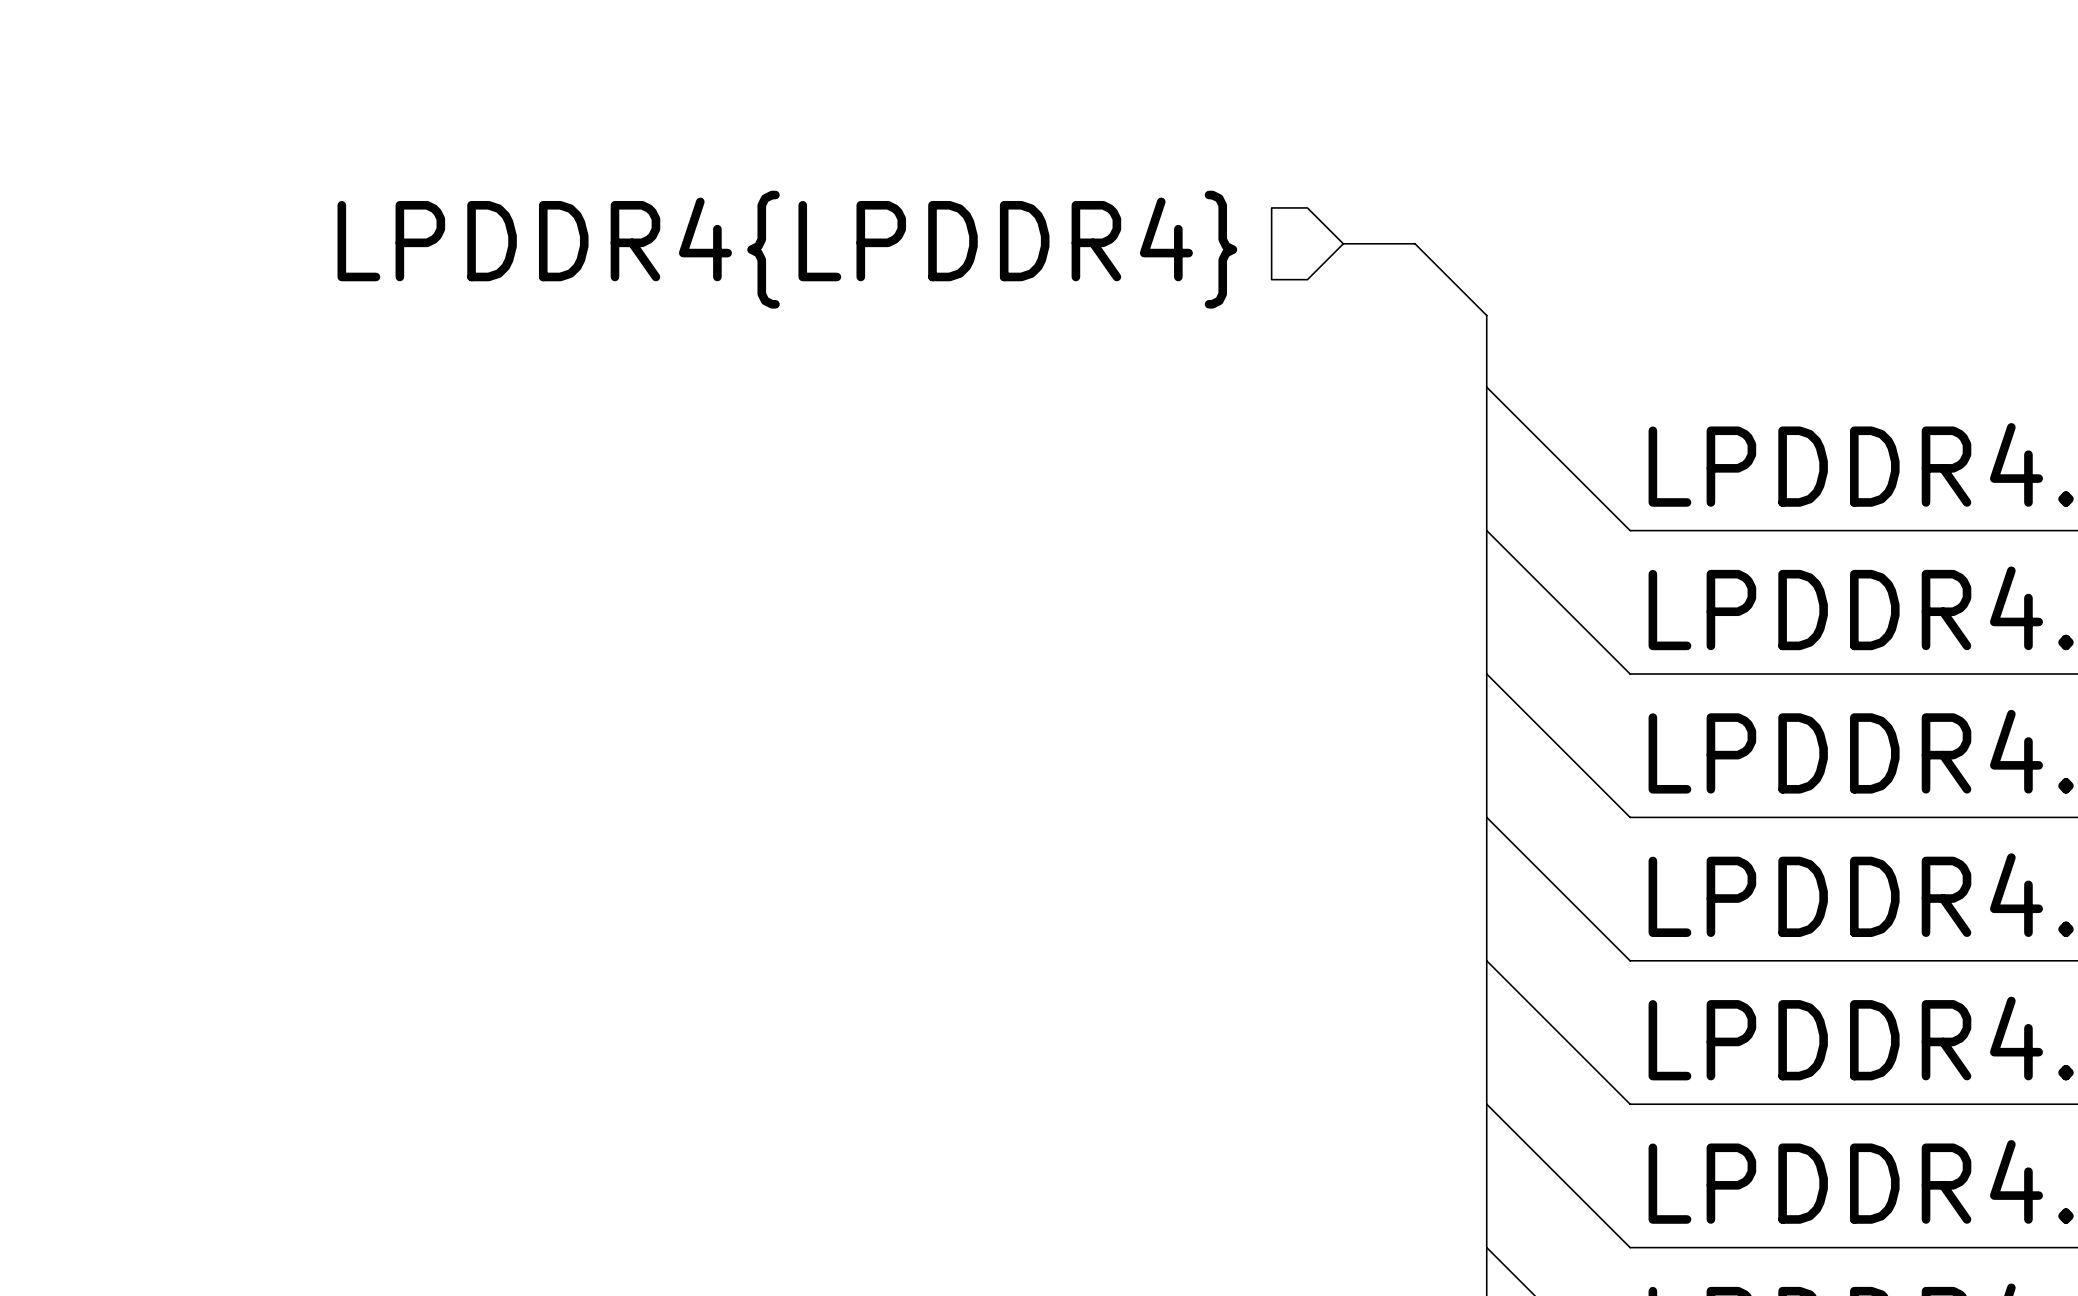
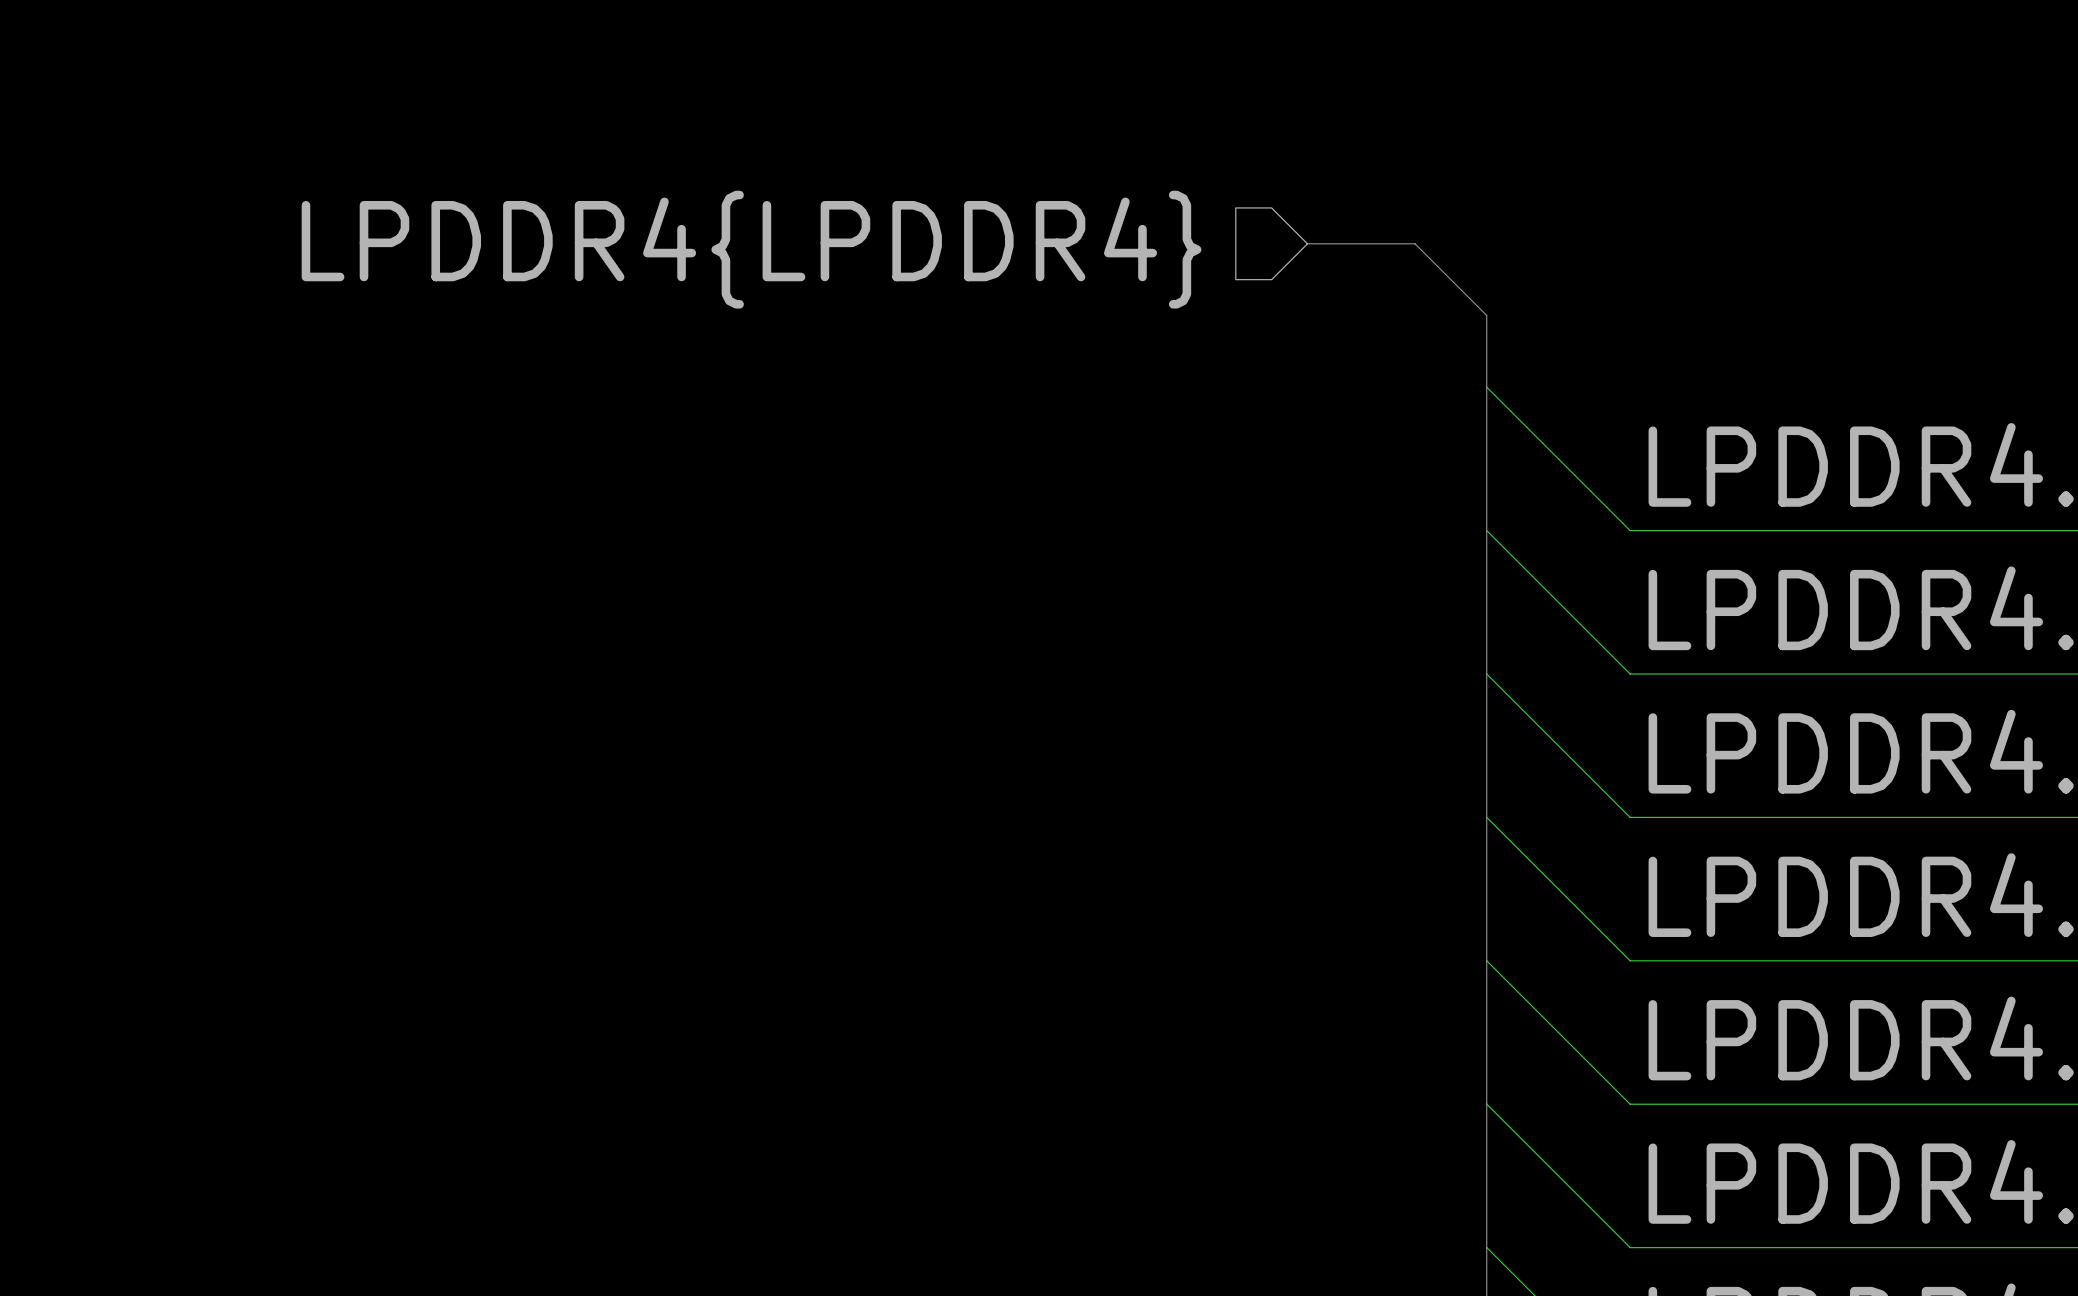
bus: none -> (1307, 243) (1343, 243)
hierarchical label position: LPDDR4{LPDDR4} (787, 249) -> LPDDR4{LPDDR4} (751, 249)

